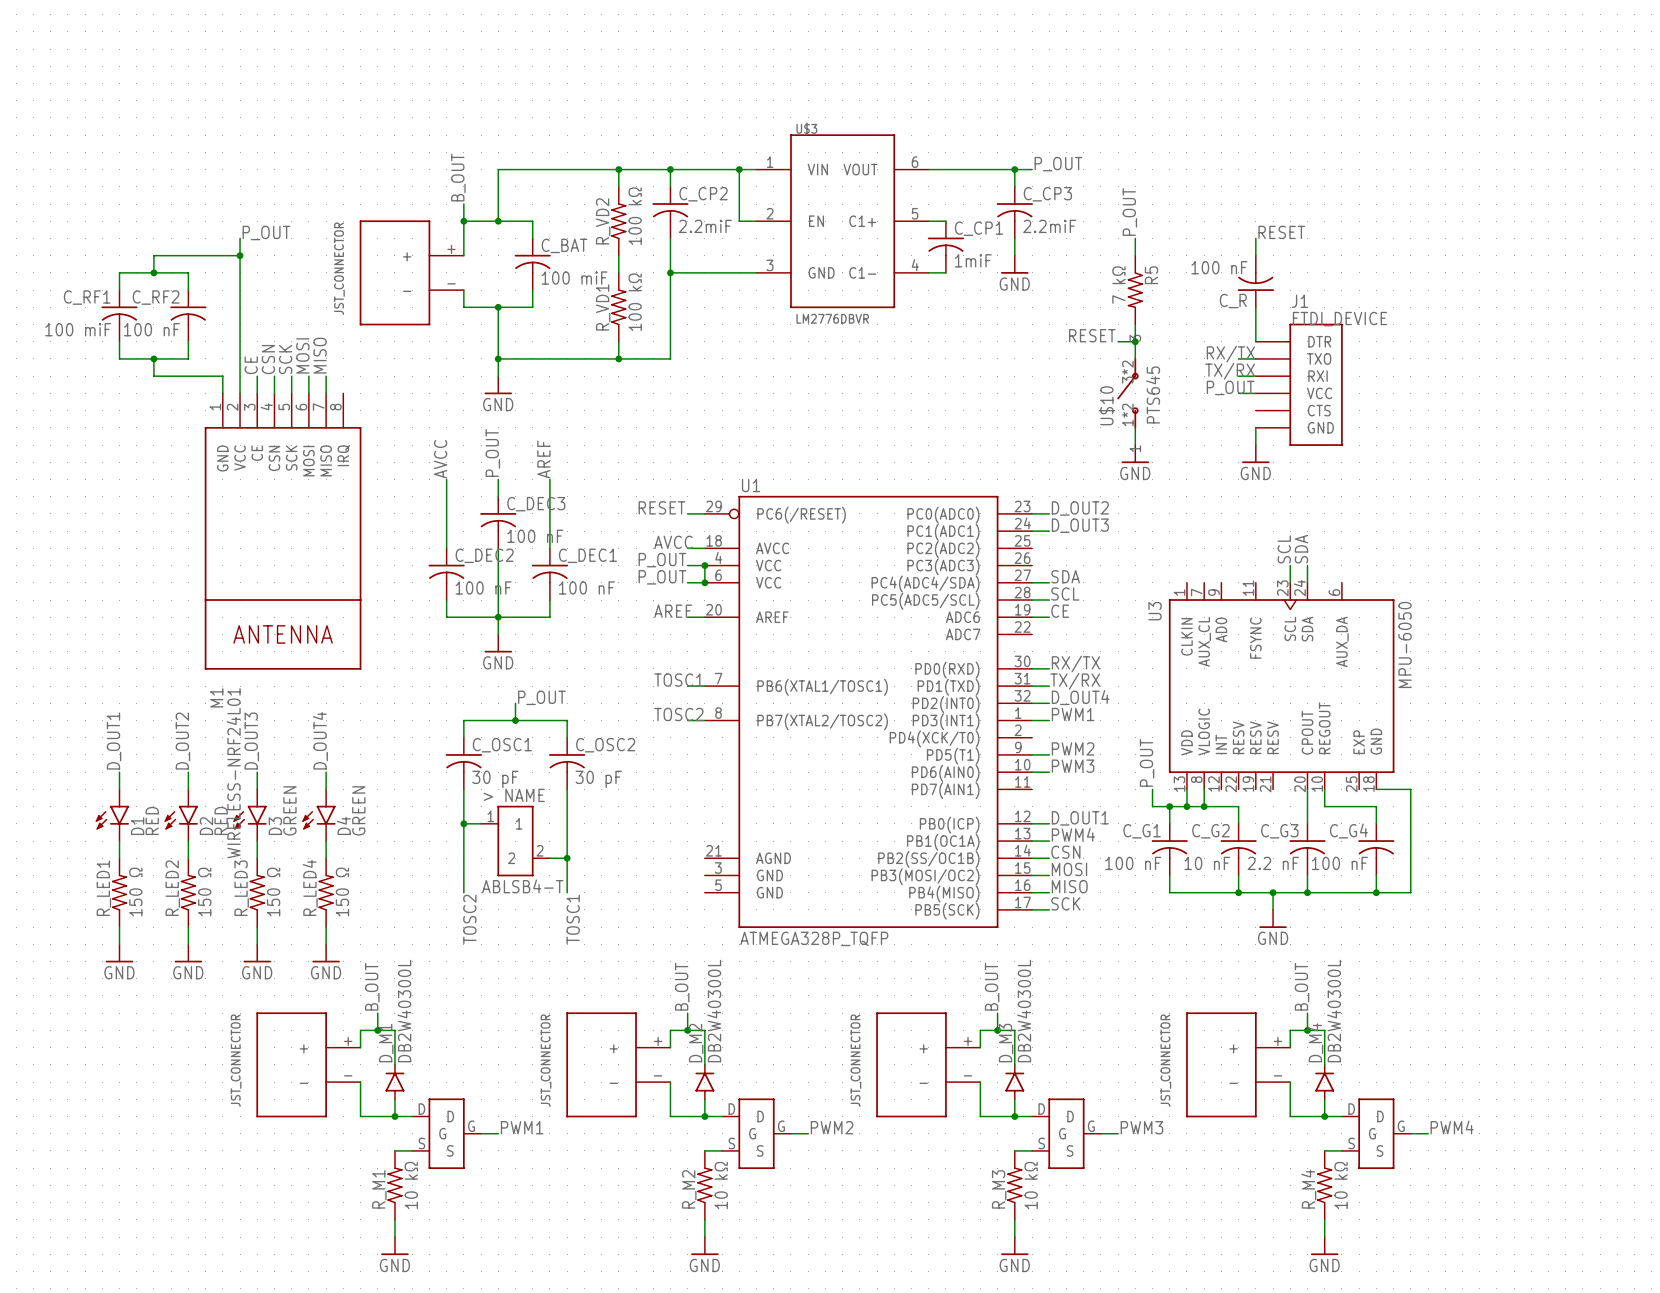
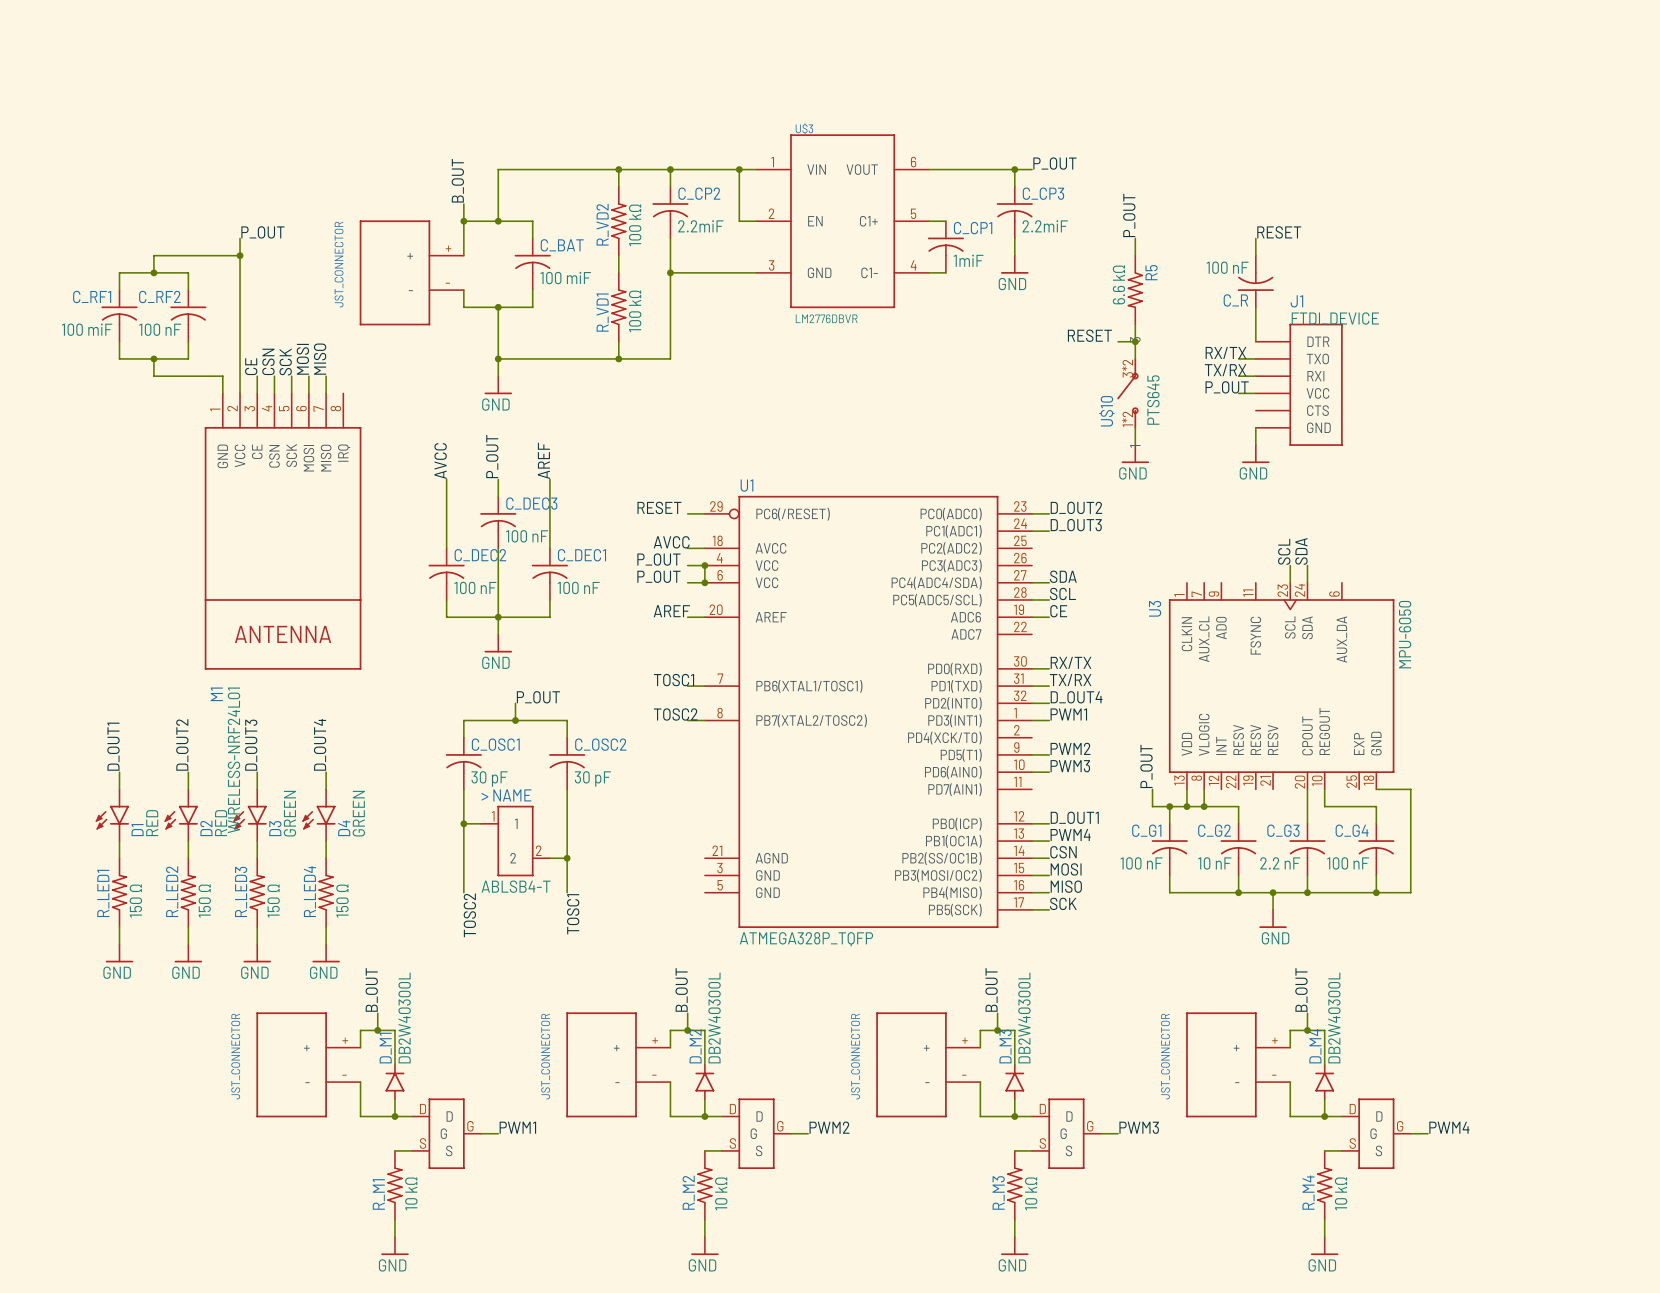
R5 value: 7 kΩ (1118, 285) -> 6.6 kΩ (1118, 284)

